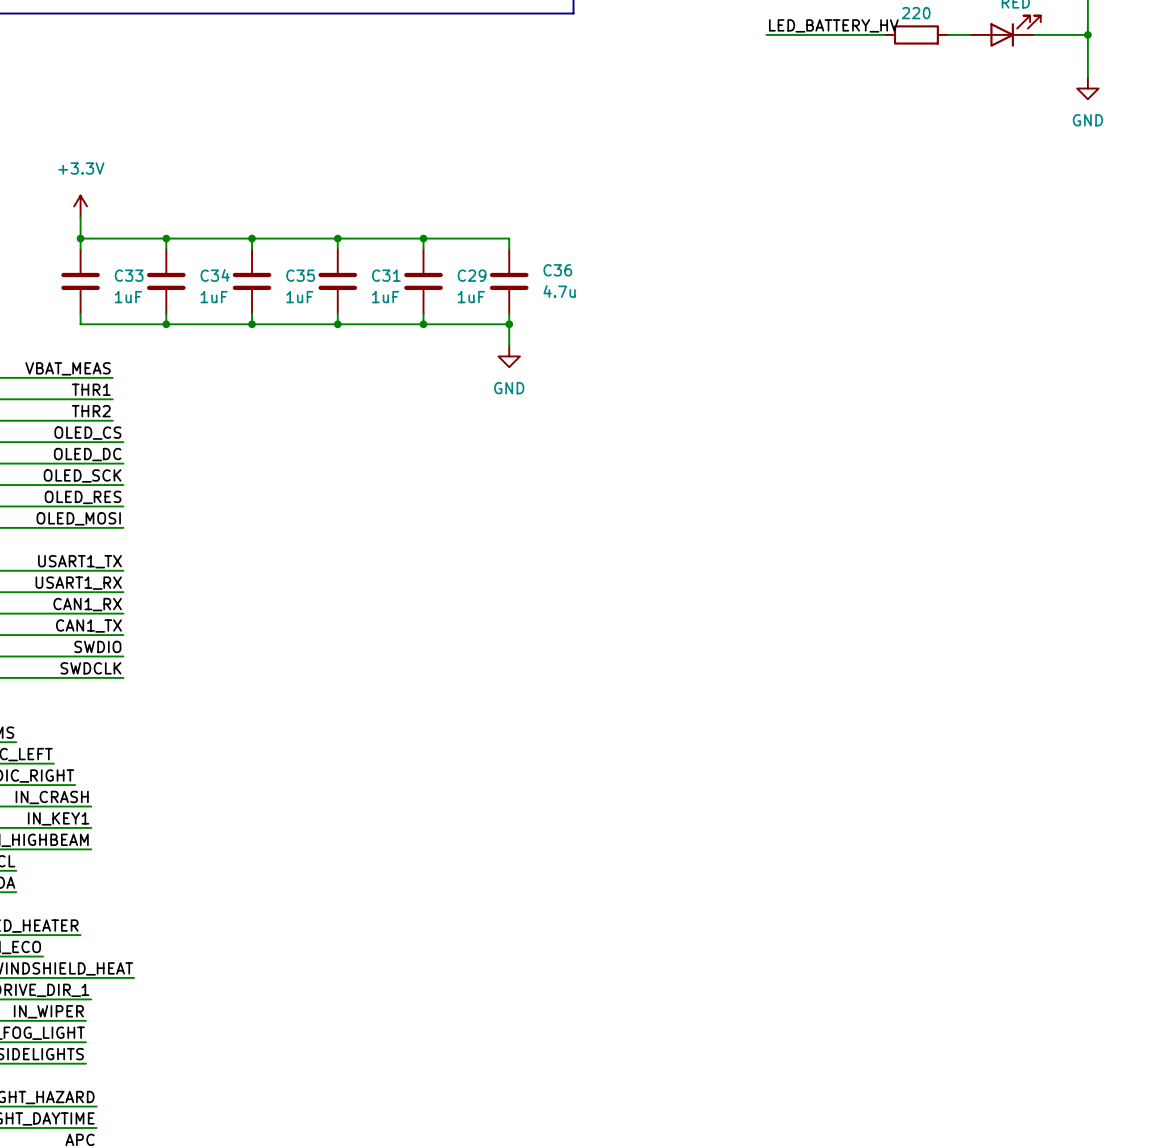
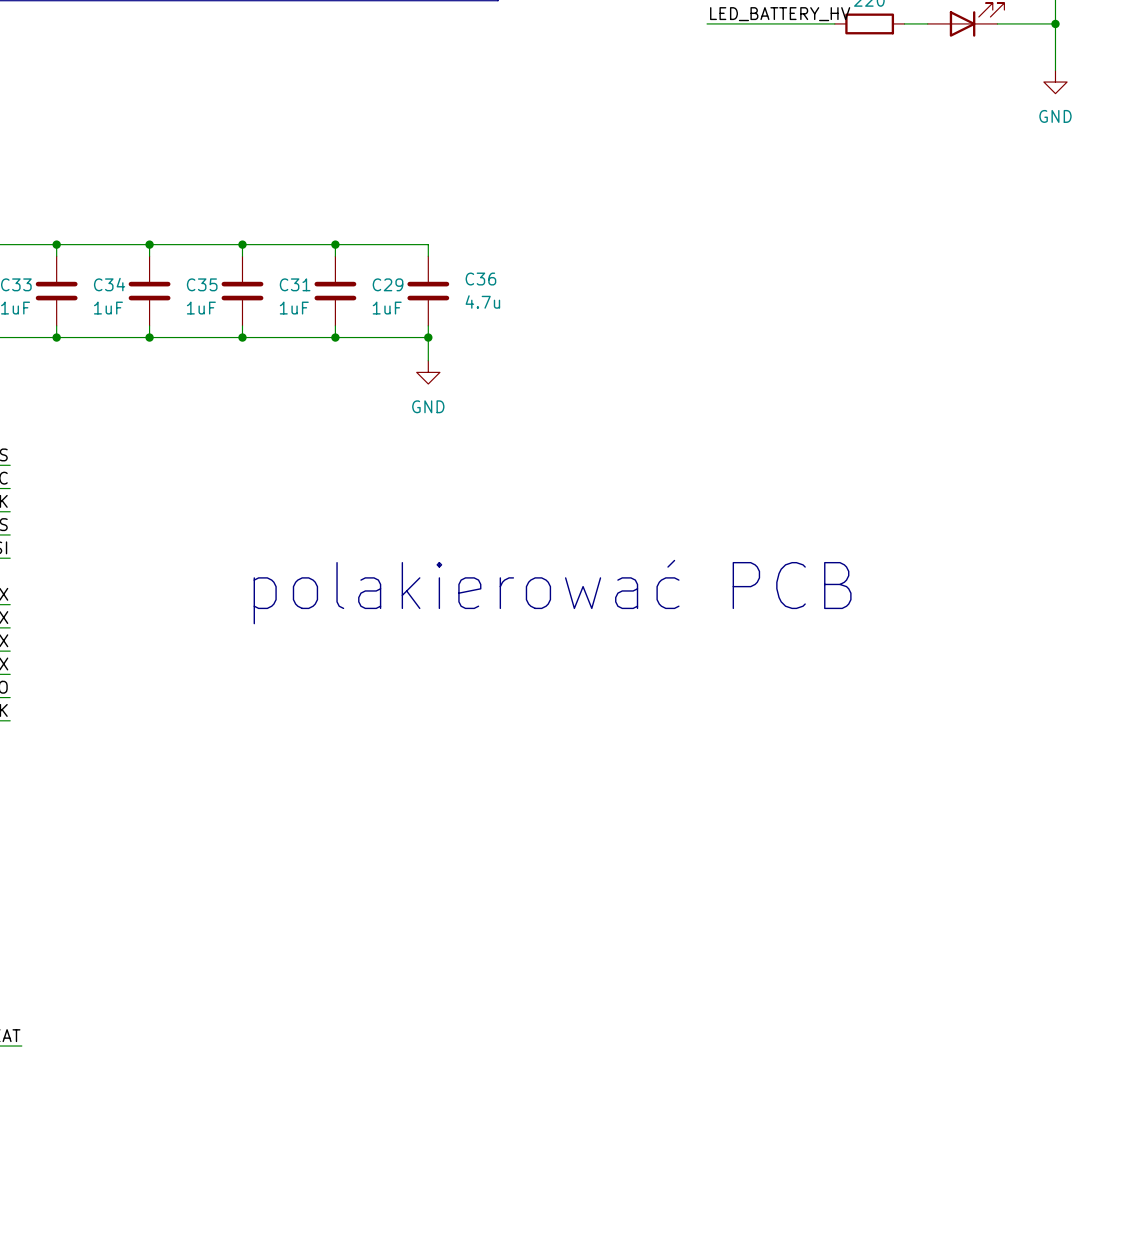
text: none -> polakierować PCB (552, 592)

